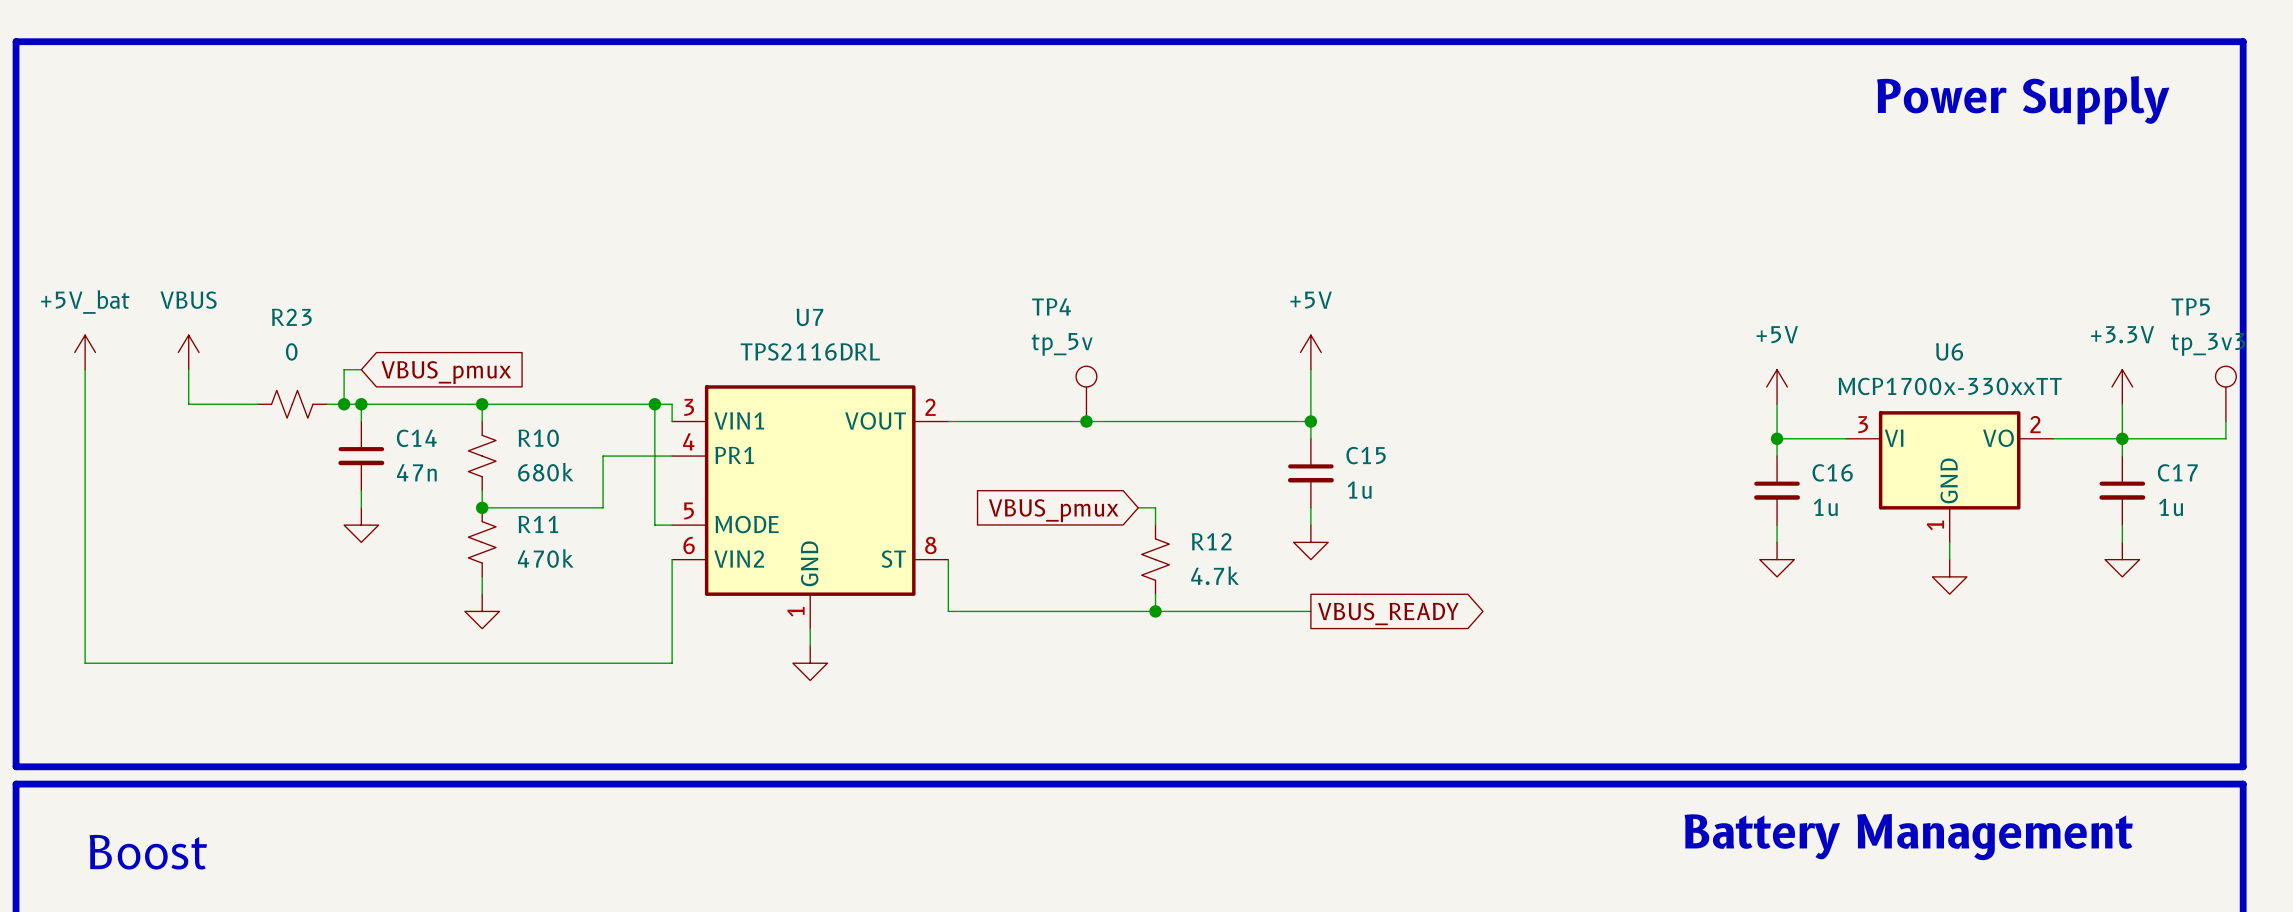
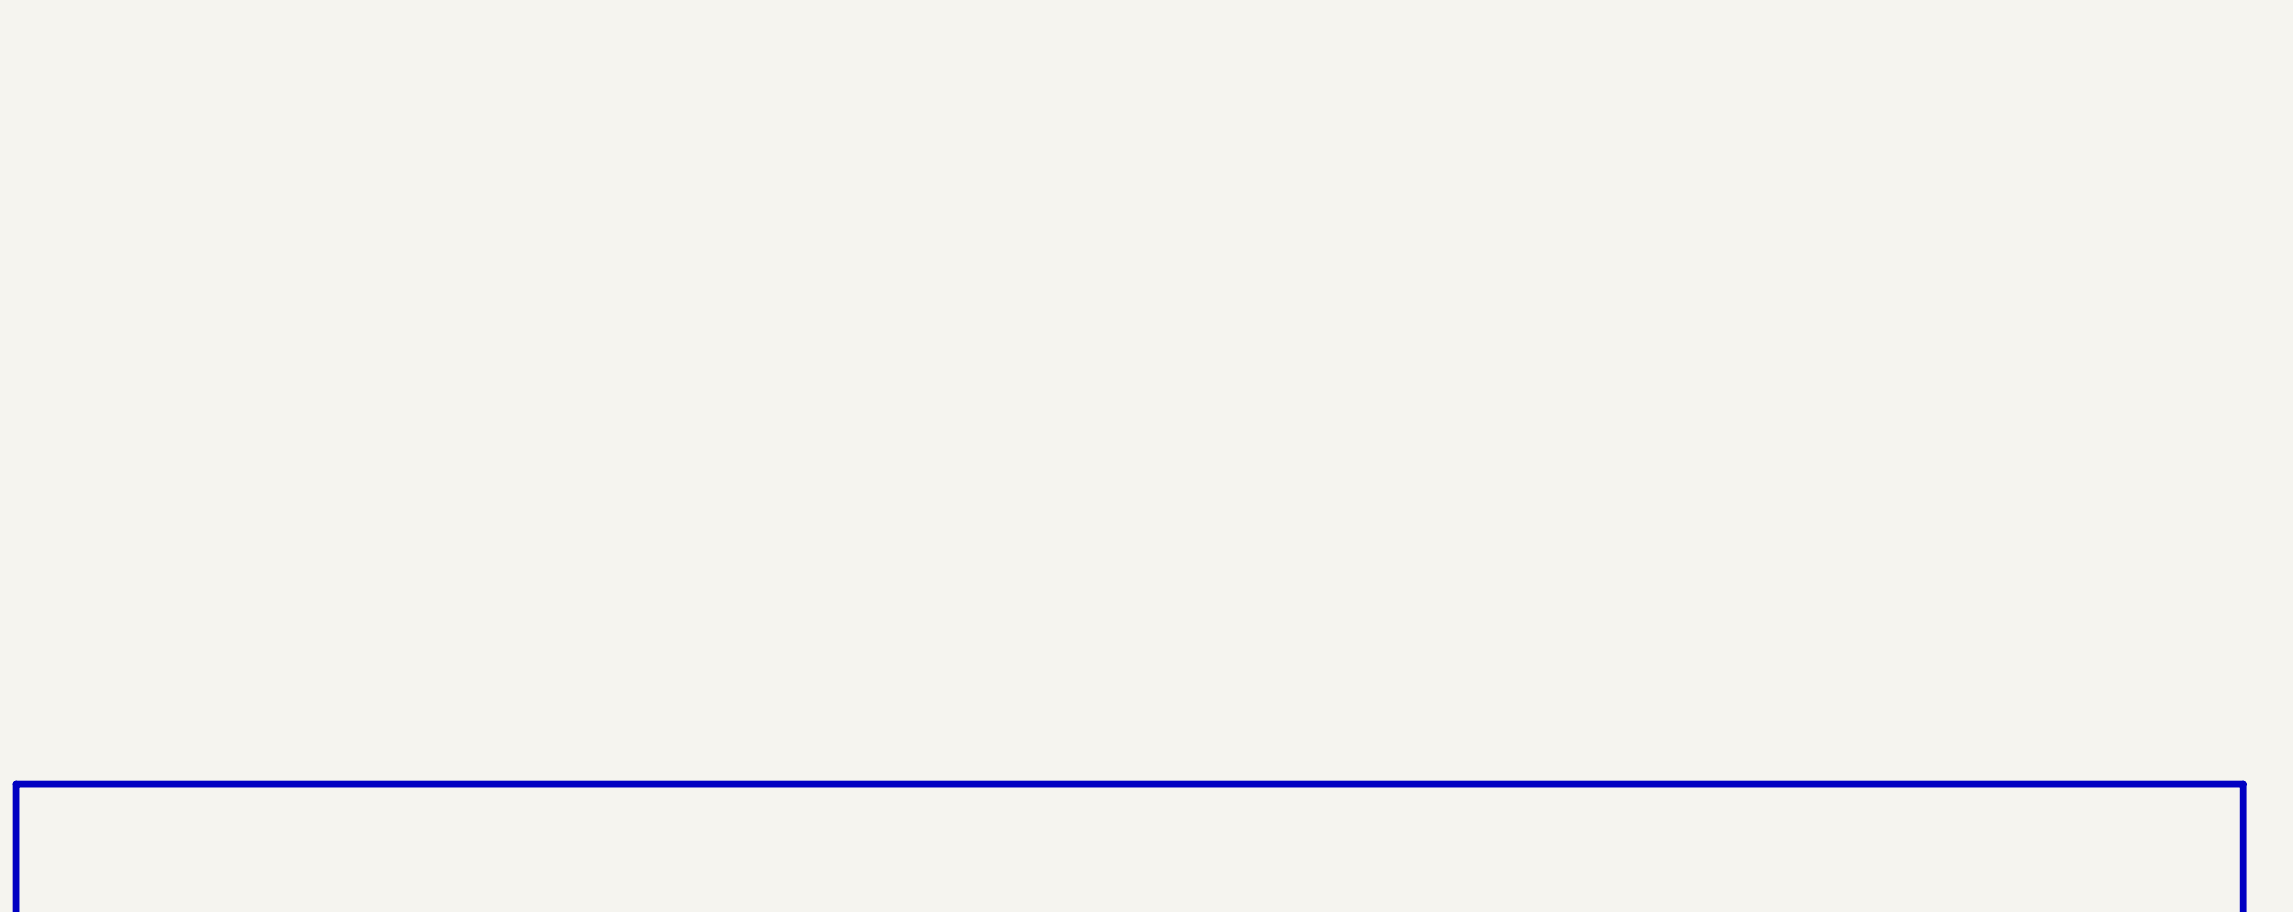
line: (16, 41) (16, 766) (2243, 766) (2243, 41) (16, 41) -> none
text: Power Supply (2023, 100) -> none
power symbol: +5V_bat (85, 352) -> none
power symbol: VBUS (188, 352) -> none
power symbol: +5V (1310, 352) -> none
wire: (85, 369) (85, 663) (672, 663) (672, 559) -> none
wire: (188, 369) (188, 404) (257, 404) -> none
wire: (361, 369) (344, 369) (344, 404) -> none
wire: (1310, 369) (1310, 438) -> none
global label: VBUS_pmux (446, 372) -> none
power symbol: +5V (1777, 386) -> none
power symbol: +3.3V (2122, 386) -> none
TP4: tp_5v (1086, 393) -> none
TP5: tp_3v3 (2225, 393) -> none
R23: 0 (292, 404) -> none
wire: (326, 404) (672, 404) (672, 421) -> none
junction: (344, 404) -> none
wire: (361, 404) (361, 421) -> none
junction: (361, 404) -> none
wire: (482, 404) (482, 421) -> none
junction: (482, 404) -> none
wire: (654, 404) (654, 525) (672, 525) -> none
junction: (654, 404) -> none
wire: (1777, 404) (1777, 456) -> none
wire: (2122, 404) (2122, 456) -> none
wire: (948, 421) (1310, 421) -> none
junction: (1086, 421) -> none
junction: (1310, 421) -> none
wire: (2225, 421) (2225, 438) (2053, 438) -> none
wire: (1777, 438) (1846, 438) -> none
junction: (1777, 438) -> none
junction: (2122, 438) -> none
C14: 47n (361, 456) -> none
R10: 680k (482, 456) -> none
wire: (672, 456) (603, 456) (603, 507) (482, 507) (482, 490) -> none
C15: 1u (1310, 473) -> none
U6: MCP1700x-330xxTT (1949, 476) -> none
wire: (361, 490) (361, 507) -> none
C16: 1u (1777, 490) -> none
C17: 1u (2122, 490) -> none
U7: TPS2116DRL (810, 506) -> none
junction: (482, 507) -> none
wire: (1138, 507) (1155, 507) (1155, 525) -> none
wire: (1310, 507) (1310, 525) -> none
global label: VBUS_pmux (1053, 510) -> none
power symbol: (361, 525) -> none
wire: (1777, 525) (1777, 542) -> none
wire: (2122, 525) (2122, 542) -> none
R11: 470k (482, 542) -> none
power symbol: (1310, 542) -> none
wire: (1949, 542) (1949, 559) -> none
wire: (948, 559) (948, 611) (1310, 611) -> none
R12: 4.7k (1155, 559) -> none
power symbol: (1777, 559) -> none
power symbol: (2122, 559) -> none
wire: (482, 576) (482, 594) -> none
power symbol: (1949, 576) -> none
wire: (1155, 594) (1155, 611) -> none
power symbol: (482, 611) -> none
junction: (1155, 611) -> none
global label: VBUS_READY (1388, 614) -> none
wire: (810, 628) (810, 645) -> none
power symbol: (810, 663) -> none
text: Battery Management (1908, 837) -> none
text: Boost (148, 852) -> none

